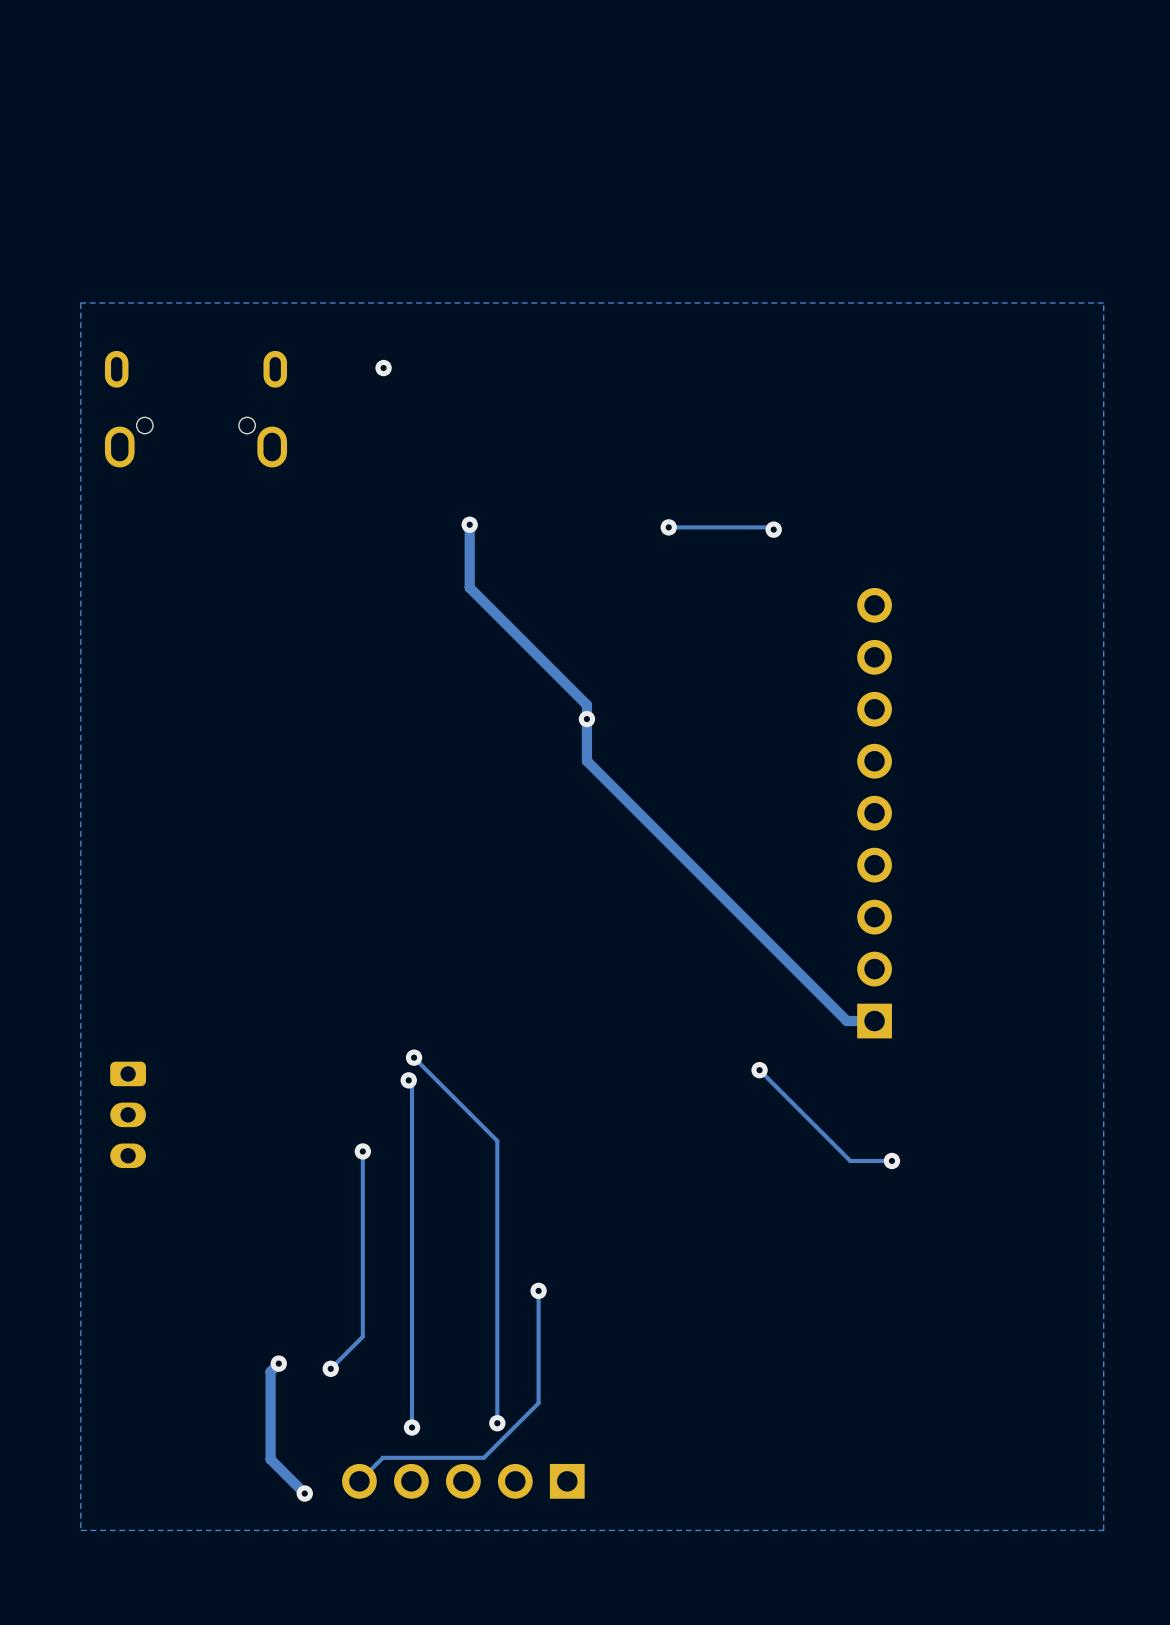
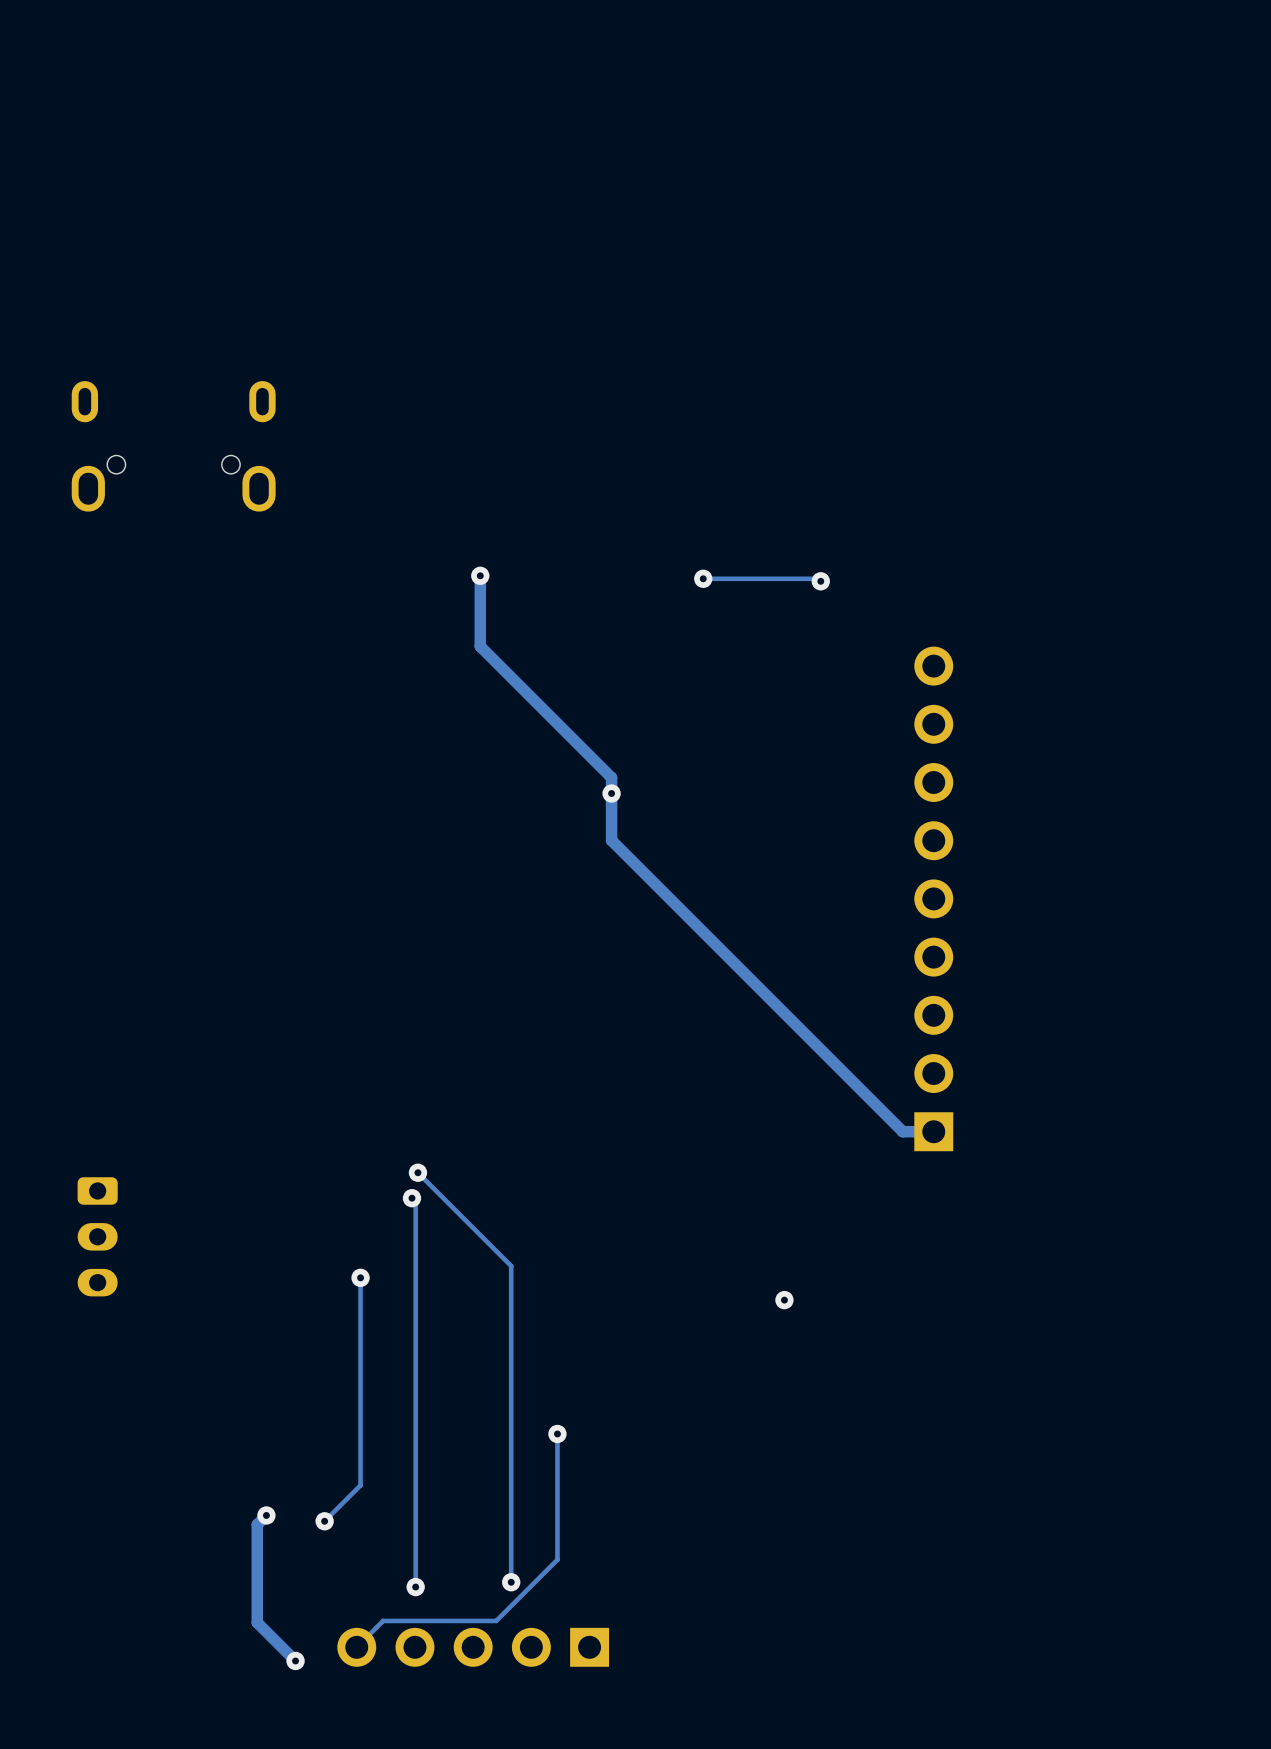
zone outline: (1103, 302) (1103, 1530) (80, 1530) (80, 302) (1103, 302) -> none
via: (383, 368) -> none
track: (759, 1070) (850, 1160) (891, 1160) -> none
via: (759, 1070) -> none
via: (891, 1160) -> none
via: none -> (784, 1300)

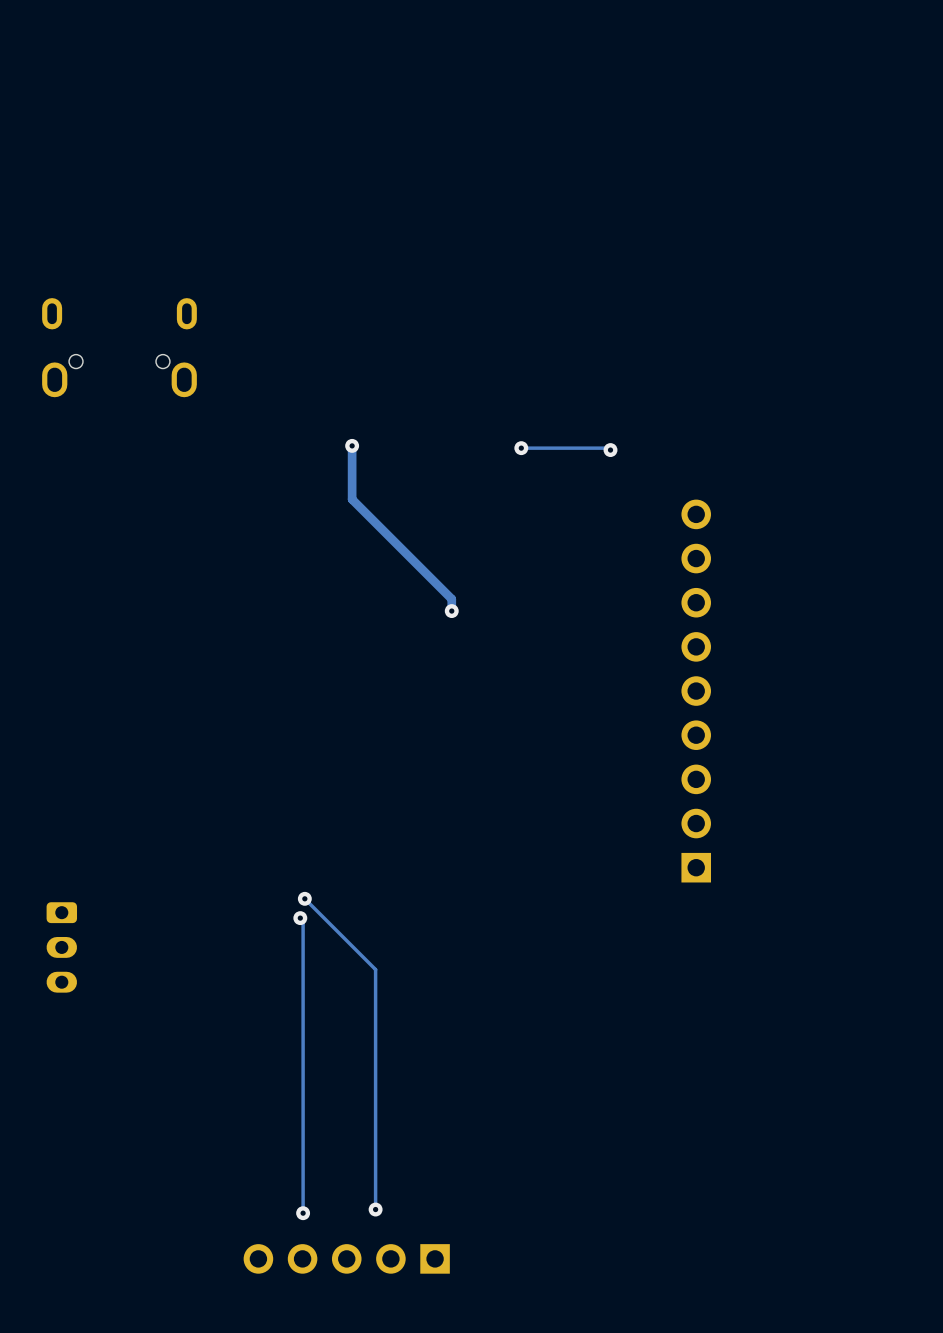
track: (611, 793) (611, 840) (902, 1131) (933, 1131) -> none
track: (360, 1277) (360, 1485) (324, 1521) -> none
via: (360, 1277) -> none
via: (784, 1300) -> none
track: (557, 1433) (557, 1559) (496, 1620) (383, 1620) (356, 1647) -> none
via: (557, 1433) -> none
track: (266, 1515) (257, 1524) (257, 1622) (295, 1660) -> none
via: (266, 1515) -> none
via: (324, 1521) -> none
via: (295, 1660) -> none

